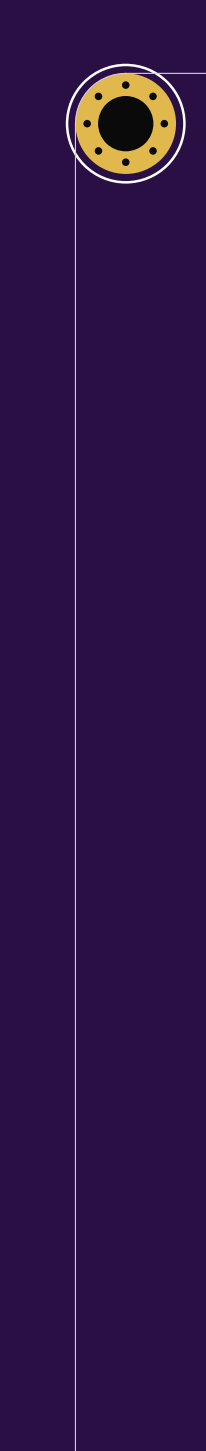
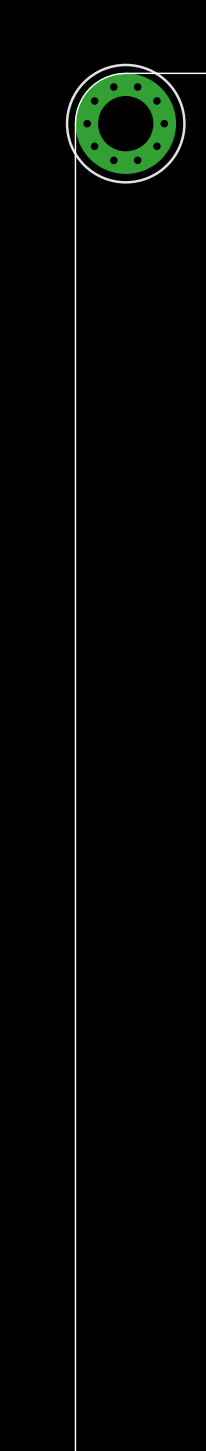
part footprint: [65, 63, 186, 184] -> [65, 63, 186, 184]

